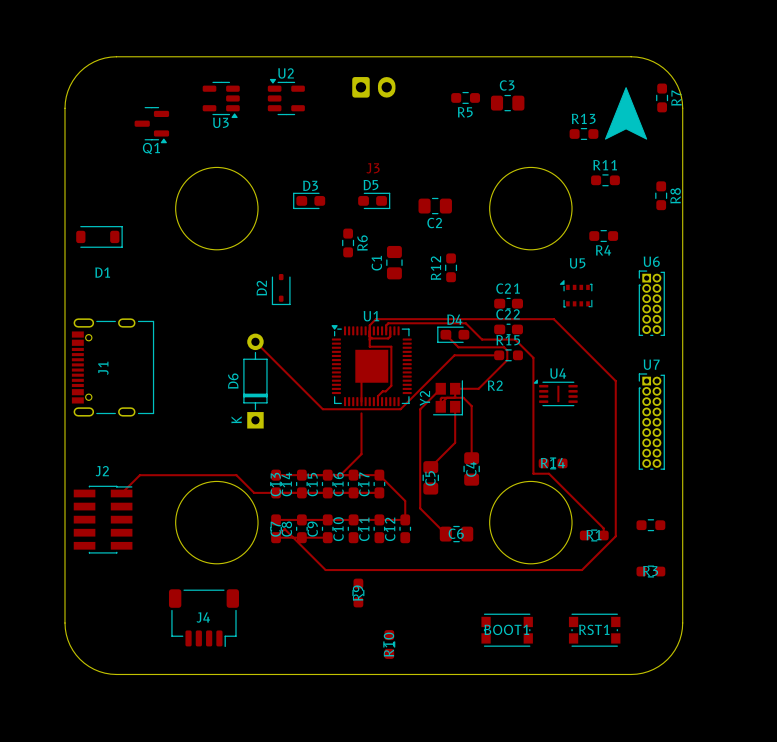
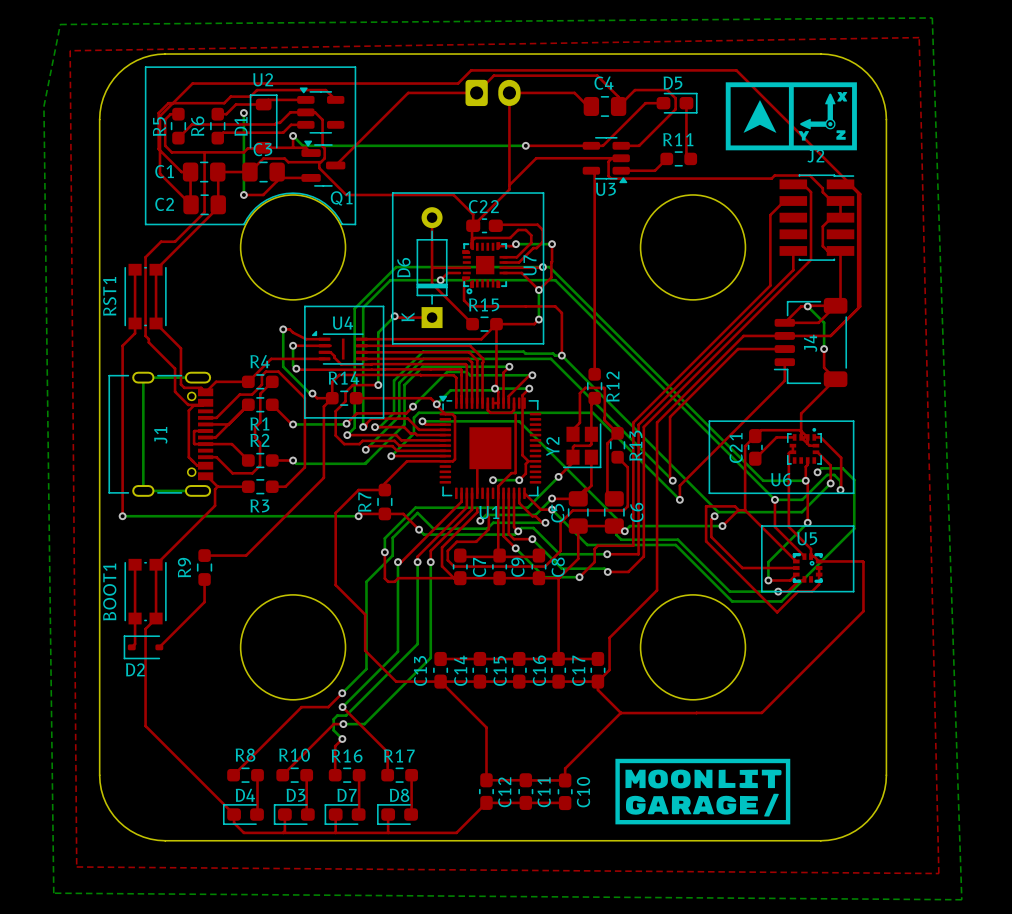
bottom zone outline: none -> (932, 17) (60, 24) (43, 106) (53, 893) (961, 899) (932, 17)
top zone outline: none -> (919, 37) (938, 873) (76, 866) (70, 50) (919, 37)
line: none -> (145, 67) (145, 224) (243, 224) (251, 212) (261, 203) (279, 194) (292, 193) (306, 194) (319, 199) (330, 207) (342, 224) (355, 224) (355, 67) (145, 67)
U2 name position: U2 (286, 73) -> U2 (263, 79)
drawing: none -> [725, 82, 857, 151]
drawing: [604, 87, 648, 140] -> none
top track: none -> (305, 99) (268, 99) (263, 104) (236, 104) (226, 114) (217, 114)
top track: none -> (335, 99) (325, 90) (257, 90) (250, 96) (230, 96) (224, 103) (168, 103) (158, 113) (158, 149) (181, 172) (190, 172) (190, 204)
top track: none -> (663, 103) (645, 103) (602, 145) (525, 145)
top track: none -> (686, 103) (686, 154) (690, 158)
U2 position: (286, 97) -> (320, 110)
top track: none -> (591, 106) (588, 106) (574, 92) (509, 92) (509, 189) (472, 226) (472, 246)
R5 rotation: 0° (465, 97) -> 90° clockwise (178, 126)
R5 position: (465, 97) -> (178, 126)
R7 position: (662, 97) -> (384, 501)
R7 name position: R7 (676, 98) -> R7 (364, 502)
U3 position: (221, 99) -> (606, 160)
bottom track: none -> (243, 113) (243, 194)
via: none -> (243, 113)
C3 position: (507, 103) -> (263, 172)
top track: none -> (178, 114) (170, 114) (165, 119) (165, 145) (171, 152) (243, 152) (247, 148) (305, 147) (311, 153)
top track: none -> (305, 124) (291, 124) (283, 132) (223, 132) (217, 138)
top track: none -> (293, 135) (293, 147)
bottom track: none -> (293, 135) (302, 145) (525, 145)
via: none -> (293, 135)
top track: none -> (178, 138) (192, 124) (275, 124) (279, 122) (290, 112) (315, 112) (322, 119) (322, 146) (324, 148) (324, 158) (320, 162) (288, 162) (284, 158) (263, 158) (249, 172) (217, 172) (218, 207) (156, 269) (156, 323) (180, 348) (180, 384) (184, 387) (201, 387) (205, 392) (216, 381) (248, 381) (271, 358) (324, 358)
Q1 rotation: 0° (151, 125) -> 180° (323, 163)
Q1 position: (151, 125) -> (323, 163)
via: none -> (525, 145)
top track: none -> (621, 145) (639, 145) (675, 109) (675, 98) (667, 90) (634, 90) (618, 106) (618, 96) (597, 75) (493, 75) (476, 92) (408, 92) (335, 165)
top track: none -> (204, 152) (204, 212) (175, 241) (161, 241) (145, 257) (145, 335) (148, 342) (175, 368) (175, 391) (188, 404) (203, 404)
R13 rotation: 0° (583, 133) -> 90° clockwise (617, 445)
R13 position: (583, 133) -> (617, 445)
top track: none -> (611, 158) (608, 161) (608, 176) (611, 178) (771, 178) (774, 175) (809, 175) (831, 201) (840, 201) (840, 217) (831, 217) (822, 226) (822, 246) (827, 250) (840, 250) (840, 300) (818, 322) (784, 322) (801, 306) (835, 305)
top track: none -> (621, 158) (536, 158) (509, 185)
top track: none -> (666, 158) (654, 170) (621, 170)
top track: none -> (319, 162) (319, 168) (346, 194) (453, 194) (473, 214) (473, 225)
top track: none -> (591, 170) (594, 174) (594, 374)
top track: none -> (311, 177) (283, 177) (277, 172) (277, 181) (263, 194) (243, 194)
top track: none -> (784, 184) (803, 184) (811, 192) (811, 259) (643, 427) (643, 556) (628, 571) (607, 571)
top track: none -> (840, 184) (849, 184) (858, 193) (858, 308)
line: none -> (392, 193) (543, 193) (543, 343) (392, 343) (392, 193)
via: none -> (243, 194)
J3 name: J3 (373, 168) -> none
top track: none -> (793, 201) (784, 201) (770, 215) (770, 285) (633, 422) (633, 545) (597, 545) (594, 549) (594, 562) (579, 577)
top track: none -> (191, 204) (159, 173) (159, 116) (192, 83) (458, 83) (471, 70) (736, 70) (860, 194) (860, 306) (830, 335) (743, 335) (657, 422) (657, 590) (609, 637) (609, 669) (597, 681)
R11 position: (605, 180) -> (678, 158)
top track: none -> (440, 217) (432, 217) (432, 283) (472, 324)
top track: none -> (495, 225) (537, 224) (542, 229) (542, 241) (536, 248) (533, 248) (519, 262) (503, 262)
R8 rotation: 0° (661, 195) -> 90° clockwise (245, 775)
R8 position: (661, 195) -> (245, 775)
R8 name position: R8 (675, 195) -> R8 (245, 755)
D3 position: (309, 200) -> (294, 814)
D5 position: (374, 200) -> (677, 103)
top track: none -> (472, 240) (474, 237) (510, 237) (518, 230) (525, 230) (531, 235) (531, 242) (516, 257) (503, 257)
top track: none -> (516, 243) (514, 246) (498, 246)
bottom track: none -> (515, 244) (552, 244)
via: none -> (515, 244)
top track: none -> (552, 244) (551, 277) (538, 290) (521, 272) (503, 272)
via: none -> (552, 244)
C2 position: (435, 206) -> (204, 204)
top track: none -> (793, 250) (793, 270) (638, 424) (638, 554) (607, 554)
C2 name position: C2 (434, 223) -> C2 (164, 204)
top track: none -> (432, 267) (466, 267)
top track: none -> (503, 267) (545, 267)
via: none -> (542, 267)
top track: none -> (135, 269) (135, 333) (122, 345) (122, 516)
top track: none -> (460, 272) (447, 272) (440, 280)
top track: none -> (466, 278) (464, 280) (464, 300) (470, 306) (555, 306) (561, 312) (561, 355)
via: none -> (440, 280)
D1 rotation: 0° (99, 236) -> 90° counterclockwise (263, 124)
D1 position: (99, 236) -> (263, 124)
R4 position: (603, 236) -> (260, 381)
R6 position: (348, 242) -> (217, 126)
bottom track: none -> (538, 290) (538, 319)
via: none -> (538, 290)
R6 name position: R6 (362, 243) -> R6 (197, 126)
R4 name position: R4 (603, 250) -> R4 (260, 361)
line: none -> (304, 306) (383, 306) (383, 417) (304, 417) (304, 306)
bottom track: none -> (807, 306) (824, 322) (824, 349)
via: none -> (807, 306)
U6 name position: U6 (651, 261) -> U6 (781, 479)
top track: none -> (394, 316) (432, 317)
bottom track: none -> (394, 316) (378, 332) (378, 385)
via: none -> (394, 316)
C1 rotation: 0° (394, 262) -> 90° clockwise (204, 172)
C1 position: (394, 262) -> (204, 172)
top track: none -> (538, 319) (534, 324) (496, 324)
via: none -> (538, 319)
R12 position: (451, 267) -> (594, 386)
top track: none -> (496, 324) (495, 388) (498, 391) (498, 403) (493, 403)
top track: none -> (496, 324) (481, 339) (361, 339)
R12 name position: R12 (435, 268) -> R12 (612, 386)
U6 footprint: [638, 270, 665, 336] -> [787, 427, 822, 465]
D1 name position: D1 (102, 272) -> D1 (241, 126)
top track: none -> (283, 329) (289, 329) (306, 339) (319, 339)
bottom track: none -> (283, 329) (283, 366) (310, 393) (312, 393)
via: none -> (283, 329)
U5 footprint: [559, 280, 593, 308] -> [792, 553, 823, 583]
top track: none -> (293, 345) (330, 345)
bottom track: none -> (293, 345) (293, 365) (296, 368)
via: none -> (293, 345)
top track: none -> (361, 345) (470, 345) (483, 358) (482, 403)
D2 name position: D2 (261, 288) -> D2 (135, 669)
C21 name position: C21 (508, 288) -> C21 (736, 448)
top track: none -> (784, 349) (738, 349) (670, 417) (670, 477) (672, 480)
top track: none -> (824, 349) (824, 367) (835, 379) (801, 413) (801, 437) (807, 437) (807, 443)
via: none -> (824, 349)
D2 rotation: 0° (281, 289) -> 90° clockwise (143, 647)
D2 position: (281, 289) -> (143, 647)
top track: none -> (324, 352) (330, 352) (341, 364) (465, 364) (466, 403)
top track: none -> (361, 352) (469, 352) (477, 360) (477, 403)
via: none -> (561, 355)
top track: none -> (361, 358) (468, 358) (472, 362) (472, 403)
top track: none -> (784, 362) (784, 380) (679, 485) (679, 499)
top track: none -> (509, 366) (503, 372) (503, 403)
bottom track: none -> (509, 366) (422, 366) (404, 385) (404, 424) (365, 463) (296, 463) (293, 460)
via: none -> (509, 366)
top track: none -> (296, 368) (460, 369) (461, 403)
via: none -> (296, 368)
C21 rotation: 0° (508, 303) -> 90° clockwise (755, 447)
C21 position: (508, 303) -> (755, 447)
bottom track: none -> (532, 375) (470, 375) (466, 371) (447, 371) (411, 408)
via: none -> (532, 375)
bottom track: none -> (198, 377) (143, 377) (143, 490) (198, 490)
top track: none -> (272, 381) (260, 393) (260, 422) (255, 427) (255, 437) (260, 442) (260, 465) (252, 473) (232, 473) (216, 457) (205, 457)
top track: none -> (378, 385) (352, 385) (345, 392) (345, 401) (335, 411) (335, 435) (344, 444) (359, 444) (362, 440) (394, 440) (399, 445) (445, 445)
via: none -> (378, 385)
U1 name position: U1 (371, 316) -> U1 (489, 512)
via: none -> (495, 388)
top track: none -> (529, 388) (522, 395) (522, 455) (528, 461) (525, 463) (525, 473) (519, 480)
bottom track: none -> (529, 388) (450, 390) (436, 404)
via: none -> (529, 388)
top track: none -> (312, 393) (317, 398) (332, 398)
via: none -> (312, 393)
top track: (388, 323) (465, 323) (482, 339) (515, 339) (533, 357) (533, 473) (548, 473) (603, 528) (603, 535) -> (511, 393) (529, 375) (532, 375)
top track: none -> (332, 398) (332, 381) (339, 374) (453, 375) (456, 377) (456, 403)
top track: none -> (332, 398) (323, 406) (323, 477) (246, 555) (204, 555)
top track: none -> (356, 398) (430, 398) (445, 414) (452, 414) (455, 416) (455, 459) (452, 461) (406, 461) (384, 483) (384, 490) (358, 490) (335, 512) (335, 585) (365, 614) (365, 650) (396, 681) (597, 681)
top track: none -> (594, 398) (591, 404) (591, 444) (574, 445) (573, 462) (558, 476)
C22 position: (508, 329) -> (484, 225)
top track: none -> (205, 402) (202, 405) (194, 405) (188, 410) (188, 457) (197, 465) (205, 465)
top track: (369, 330) (369, 325) (375, 319) (553, 319) (615, 381) (615, 536) (582, 570) (325, 570) (284, 529) (276, 537) (327, 537) -> none
via: none -> (436, 404)
top track: none -> (248, 404) (215, 437) (205, 437)
top track: none -> (272, 404) (293, 424)
top track: none -> (413, 406) (406, 413) (356, 413) (346, 423)
via: none -> (413, 406)
top track: (445, 334) (458, 347) (504, 347) (507, 350) (507, 360) (478, 388) (455, 388) (454, 397) -> none
D4 position: (453, 334) -> (243, 814)
top track: (369, 336) (369, 346) (391, 346) (391, 385) (385, 391) (382, 391) -> (515, 414) (515, 472) (511, 473) (504, 480)
top track: (255, 341) (322, 409) (400, 409) (454, 355) (499, 355) -> none
top track: none -> (205, 417) (216, 417) (239, 394) (252, 394) (261, 384) (261, 375) (265, 371) (278, 371) (304, 398) (304, 467) (285, 486) (272, 486)
top track: none -> (422, 421) (425, 424) (445, 424)
bottom track: none -> (422, 421) (519, 421) (616, 518) (616, 534) (621, 539) (677, 539) (729, 591) (778, 591)
via: none -> (422, 421)
line: none -> (709, 421) (853, 421) (853, 493) (709, 493) (709, 421)
top track: none -> (205, 424) (228, 424)
via: none -> (293, 424)
bottom track: none -> (346, 423) (293, 424)
via: none -> (346, 423)
top track: none -> (363, 427) (366, 426) (371, 418) (407, 418) (419, 429) (445, 429)
bottom track: none -> (363, 427) (363, 307) (390, 280) (555, 280) (774, 499) (802, 499) (827, 474) (834, 474) (840, 481) (840, 490)
via: none -> (363, 427)
top track: none -> (375, 427) (404, 427) (410, 433) (416, 435) (445, 435)
bottom track: none -> (375, 427) (379, 427) (394, 412) (394, 380) (423, 351) (523, 351) (525, 353) (553, 353) (561, 355) (718, 512) (801, 512) (830, 483)
via: none -> (375, 427)
top track: none -> (205, 431) (194, 431) (194, 444) (231, 444) (248, 460)
top track: none -> (347, 435) (396, 435) (401, 440) (445, 440)
bottom track: none -> (347, 435) (354, 427) (354, 308) (396, 267) (549, 267) (763, 480) (805, 480)
via: none -> (347, 435)
top track: none -> (573, 434) (573, 429) (579, 422) (579, 393) (585, 387) (604, 387) (604, 420) (617, 433) (607, 443) (607, 491) (614, 498)
R15 position: (508, 355) -> (484, 324)
top track: none -> (794, 437) (776, 437) (755, 458)
top track: none -> (801, 437) (809, 445) (815, 445)
top track: none -> (807, 437) (800, 430) (761, 430) (745, 446) (745, 510)
top track: none -> (814, 437) (820, 437) (841, 457) (840, 490)
top track: none -> (792, 445) (792, 452) (788, 453) (788, 526) (811, 549) (811, 556) (814, 556) (819, 561) (863, 562) (863, 611) (761, 712) (696, 712)
U7 name position: U7 (651, 364) -> U7 (529, 265)
J1 rotation: 0° (113, 367) -> 180° (160, 434)
top track: none -> (365, 449) (369, 446) (392, 446) (397, 450) (445, 450)
bottom track: none -> (365, 449) (399, 416) (399, 382) (423, 358) (550, 358) (672, 480)
via: none -> (365, 449)
top track: none -> (815, 452) (830, 465) (830, 483)
bottom track: none -> (391, 456) (413, 433) (413, 417) (418, 412) (592, 412) (679, 499)
via: none -> (391, 456)
top track: none -> (391, 456) (445, 456)
top track: none -> (591, 457) (591, 485) (578, 498) (552, 498)
top track: none -> (617, 457) (627, 467) (627, 506) (623, 510) (572, 510) (560, 522) (560, 551) (545, 566) (454, 566) (447, 560) (447, 550) (456, 541) (476, 541) (488, 529) (487, 493)
U7 footprint: [638, 373, 665, 470] -> [462, 242, 508, 295]
top track: none -> (272, 460) (293, 460)
via: none -> (293, 460)
top track: none -> (807, 460) (805, 466) (807, 522)
D6 position: (255, 381) -> (432, 267)
R2 name position: R2 (495, 385) -> R2 (259, 440)
bottom track: none -> (817, 472) (821, 468) (842, 468) (854, 479) (854, 528) (781, 601) (732, 601) (675, 544) (587, 544) (552, 509)
via: none -> (817, 472)
top track: none -> (205, 476) (217, 486)
bottom track: none -> (558, 476) (527, 507) (415, 507) (384, 538) (384, 552)
via: none -> (558, 476)
top track: (440, 388) (420, 409) (420, 508) (445, 534) -> none
bottom track: none -> (493, 480) (519, 480)
via: none -> (493, 480)
via: none -> (519, 480)
via: none -> (672, 480)
via: none -> (805, 480)
U4 position: (555, 392) -> (339, 347)
via: none -> (830, 483)
top track: none -> (217, 486) (248, 486)
top track: none -> (217, 486) (215, 489) (215, 505) (156, 564) (156, 618) (145, 628) (145, 726) (234, 814) (234, 823) (243, 832) (456, 832) (486, 802) (564, 802)
Y2 position: (447, 397) -> (582, 445)
via: none -> (840, 490)
top track: none -> (461, 493) (461, 501) (401, 562) (397, 562)
top track: none -> (466, 493) (466, 507) (417, 556) (417, 562)
top track: none -> (472, 493) (472, 509) (430, 550) (430, 562)
top track: none -> (498, 493) (499, 554)
top track: none -> (503, 493) (503, 536) (515, 548)
top track: none -> (508, 493) (508, 533) (514, 539) (532, 539)
top track: none -> (514, 493) (514, 527) (518, 531)
top track: none -> (519, 493) (519, 503) (532, 516) (545, 522)
top track: none -> (524, 493) (540, 509) (552, 509)
bottom track: none -> (552, 498) (535, 514) (486, 514) (480, 520)
via: none -> (552, 498)
top track: (440, 406) (441, 397) (463, 397) (471, 406) (471, 458) -> none
top track: (455, 406) (455, 442) (430, 467) -> none
via: none -> (679, 499)
top track: none -> (774, 499) (774, 526) (804, 556)
via: none -> (774, 499)
via: none -> (552, 509)
top track: none -> (738, 510) (735, 506) (706, 506) (706, 541) (777, 612) (797, 591) (812, 591) (819, 584) (819, 568)
top track: none -> (745, 510) (738, 510) (722, 526)
top track: none -> (745, 510) (796, 561)
top track: (361, 416) (361, 454) (340, 475) -> (477, 512) (442, 547) (442, 566) (454, 578)
bottom track: none -> (122, 516) (358, 516)
via: none -> (122, 516)
top track: none -> (358, 516) (360, 513) (403, 513) (419, 529)
via: none -> (358, 516)
top track: none -> (714, 516) (711, 519) (711, 537) (742, 568) (796, 568)
via: none -> (714, 516)
via: none -> (480, 520)
bottom track: none -> (545, 522) (493, 522) (487, 528) (433, 528) (417, 512) (392, 537) (392, 555) (366, 581) (366, 669) (342, 693)
via: none -> (545, 522)
bottom track: none -> (807, 522) (768, 562) (768, 580)
via: none -> (807, 522)
bottom track: none -> (722, 526) (629, 526) (624, 531)
via: none -> (722, 526)
line: none -> (761, 526) (761, 591) (853, 591) (853, 526) (761, 526)
bottom track: none -> (419, 529) (423, 534) (514, 534) (521, 528) (533, 528) (559, 554) (607, 554)
via: none -> (419, 529)
via: none -> (518, 531)
top track: none -> (624, 531) (619, 526) (578, 526) (578, 558) (558, 578) (558, 658)
via: none -> (624, 531)
bottom track: none -> (532, 539) (561, 568) (604, 568) (607, 571)
via: none -> (532, 539)
bottom track: none -> (515, 548) (544, 577) (579, 577)
via: none -> (515, 548)
top track: none -> (384, 552) (384, 578) (388, 581) (394, 581) (398, 578) (558, 578)
via: none -> (384, 552)
via: none -> (607, 554)
top track: none -> (460, 555) (538, 555)
bottom track: none -> (397, 562) (397, 651) (342, 707)
via: none -> (397, 562)
bottom track: none -> (417, 562) (417, 644) (346, 715) (337, 715) (333, 719) (333, 730) (342, 739)
via: none -> (417, 562)
bottom track: none -> (430, 562) (430, 657) (364, 724) (343, 724)
via: none -> (430, 562)
top track: none -> (135, 564) (135, 644) (131, 647)
via: none -> (607, 571)
R14 name position: R14 (552, 463) -> R14 (344, 378)
R14 position: (553, 463) -> (344, 398)
top track: none -> (796, 574) (790, 580) (768, 580)
via: none -> (579, 577)
C4 rotation: 0° (471, 468) -> 90° clockwise (604, 106)
C4 position: (471, 468) -> (604, 106)
top track: none -> (204, 579) (204, 602) (159, 647)
top track: none -> (804, 579) (799, 580) (788, 591) (778, 591)
via: none -> (768, 580)
top track: (276, 475) (379, 475) (405, 500) (405, 519) (276, 519) -> none
C5 position: (430, 477) -> (578, 512)
C5 name position: C5 (430, 478) -> C5 (557, 513)
via: none -> (778, 591)
C13 name position: C13 (275, 484) -> C13 (420, 670)
C13 position: (276, 484) -> (440, 670)
C14 position: (301, 484) -> (479, 670)
C15 position: (327, 484) -> (519, 670)
C16 position: (353, 484) -> (558, 670)
C17 position: (379, 484) -> (597, 670)
top track: (379, 492) (254, 492) (236, 475) (139, 475) (121, 493) -> none
J2 position: (103, 519) -> (816, 217)
R2 position: (650, 525) -> (260, 460)
C7 position: (276, 528) -> (460, 566)
C8 position: (301, 528) -> (538, 566)
C9 position: (327, 528) -> (499, 566)
C10 position: (353, 528) -> (565, 791)
C11 position: (379, 528) -> (525, 791)
C12 position: (405, 528) -> (486, 791)
C7 name position: C7 (275, 529) -> C7 (479, 567)
C8 name position: C8 (286, 529) -> C8 (558, 567)
C9 name position: C9 (312, 529) -> C9 (517, 567)
C10 name position: C10 (338, 529) -> C10 (583, 792)
C11 name position: C11 (364, 529) -> C11 (544, 792)
C12 name position: C12 (390, 529) -> C12 (504, 792)
top track: none -> (440, 658) (597, 658)
C6 rotation: 0° (456, 534) -> 90° clockwise (614, 512)
C6 position: (456, 534) -> (614, 512)
R1 name position: R1 (593, 535) -> R1 (259, 423)
R1 position: (594, 535) -> (260, 404)
top track: none -> (440, 681) (486, 727) (486, 780) (525, 780)
top track: none -> (597, 681) (597, 689) (621, 713) (696, 713)
top track: none -> (342, 693) (328, 707) (301, 707) (233, 775)
via: none -> (342, 693)
top track: none -> (342, 707) (387, 752) (387, 775)
via: none -> (342, 707)
R3 position: (650, 571) -> (260, 486)
R3 name position: R3 (650, 571) -> R3 (259, 505)
top track: none -> (620, 712) (565, 768) (565, 780) (525, 780)
top track: none -> (343, 724) (333, 724) (282, 775)
via: none -> (343, 724)
R9 position: (358, 593) -> (204, 567)
R9 name position: R9 (358, 593) -> R9 (184, 567)
top track: none -> (342, 739) (335, 746) (335, 775)
via: none -> (342, 739)
drawing: none -> [615, 758, 791, 825]
J4 rotation: 0° (203, 618) -> 90° clockwise (810, 342)
J4 position: (203, 618) -> (810, 342)
top track: none -> (257, 775) (257, 814)
top track: none -> (306, 775) (307, 814)
R16: none -> (347, 775)
top track: none -> (359, 775) (358, 814)
R17: none -> (399, 775)
top track: none -> (411, 775) (411, 814)
BOOT1 name position: BOOT1 (506, 629) -> BOOT1 (109, 592)
RST1 name position: RST1 (594, 629) -> RST1 (109, 296)
BOOT1 rotation: 0° (507, 630) -> 90° clockwise (145, 591)
BOOT1 position: (507, 630) -> (145, 591)
RST1 rotation: 0° (594, 630) -> 90° clockwise (145, 296)
RST1 position: (594, 630) -> (145, 296)
R10 rotation: 0° (389, 644) -> 90° clockwise (294, 775)
R10 position: (389, 644) -> (294, 775)
top track: none -> (284, 814) (283, 832)
top track: none -> (335, 814) (335, 832)
D7: none -> (345, 814)
top track: none -> (388, 814) (388, 832)
D8: none -> (397, 814)

